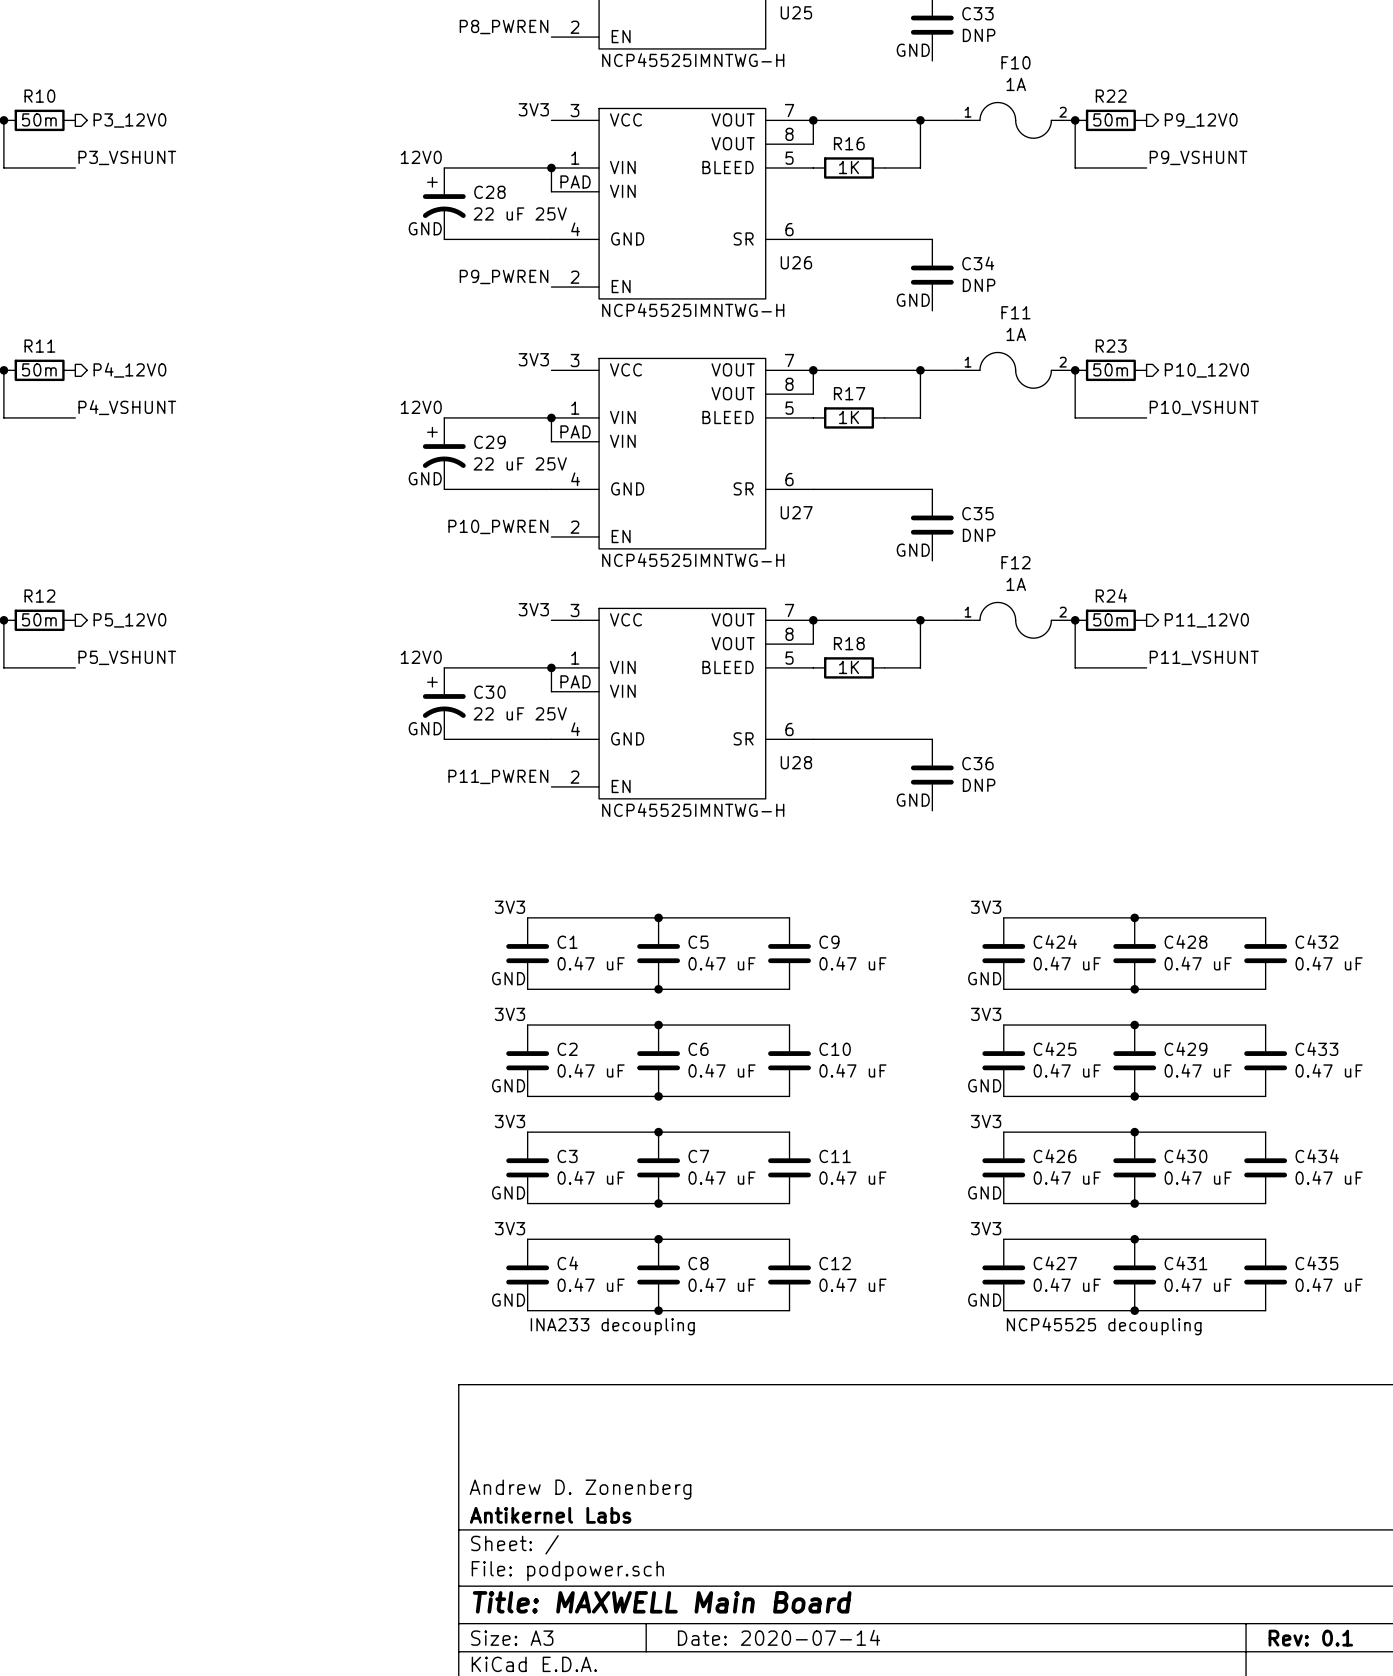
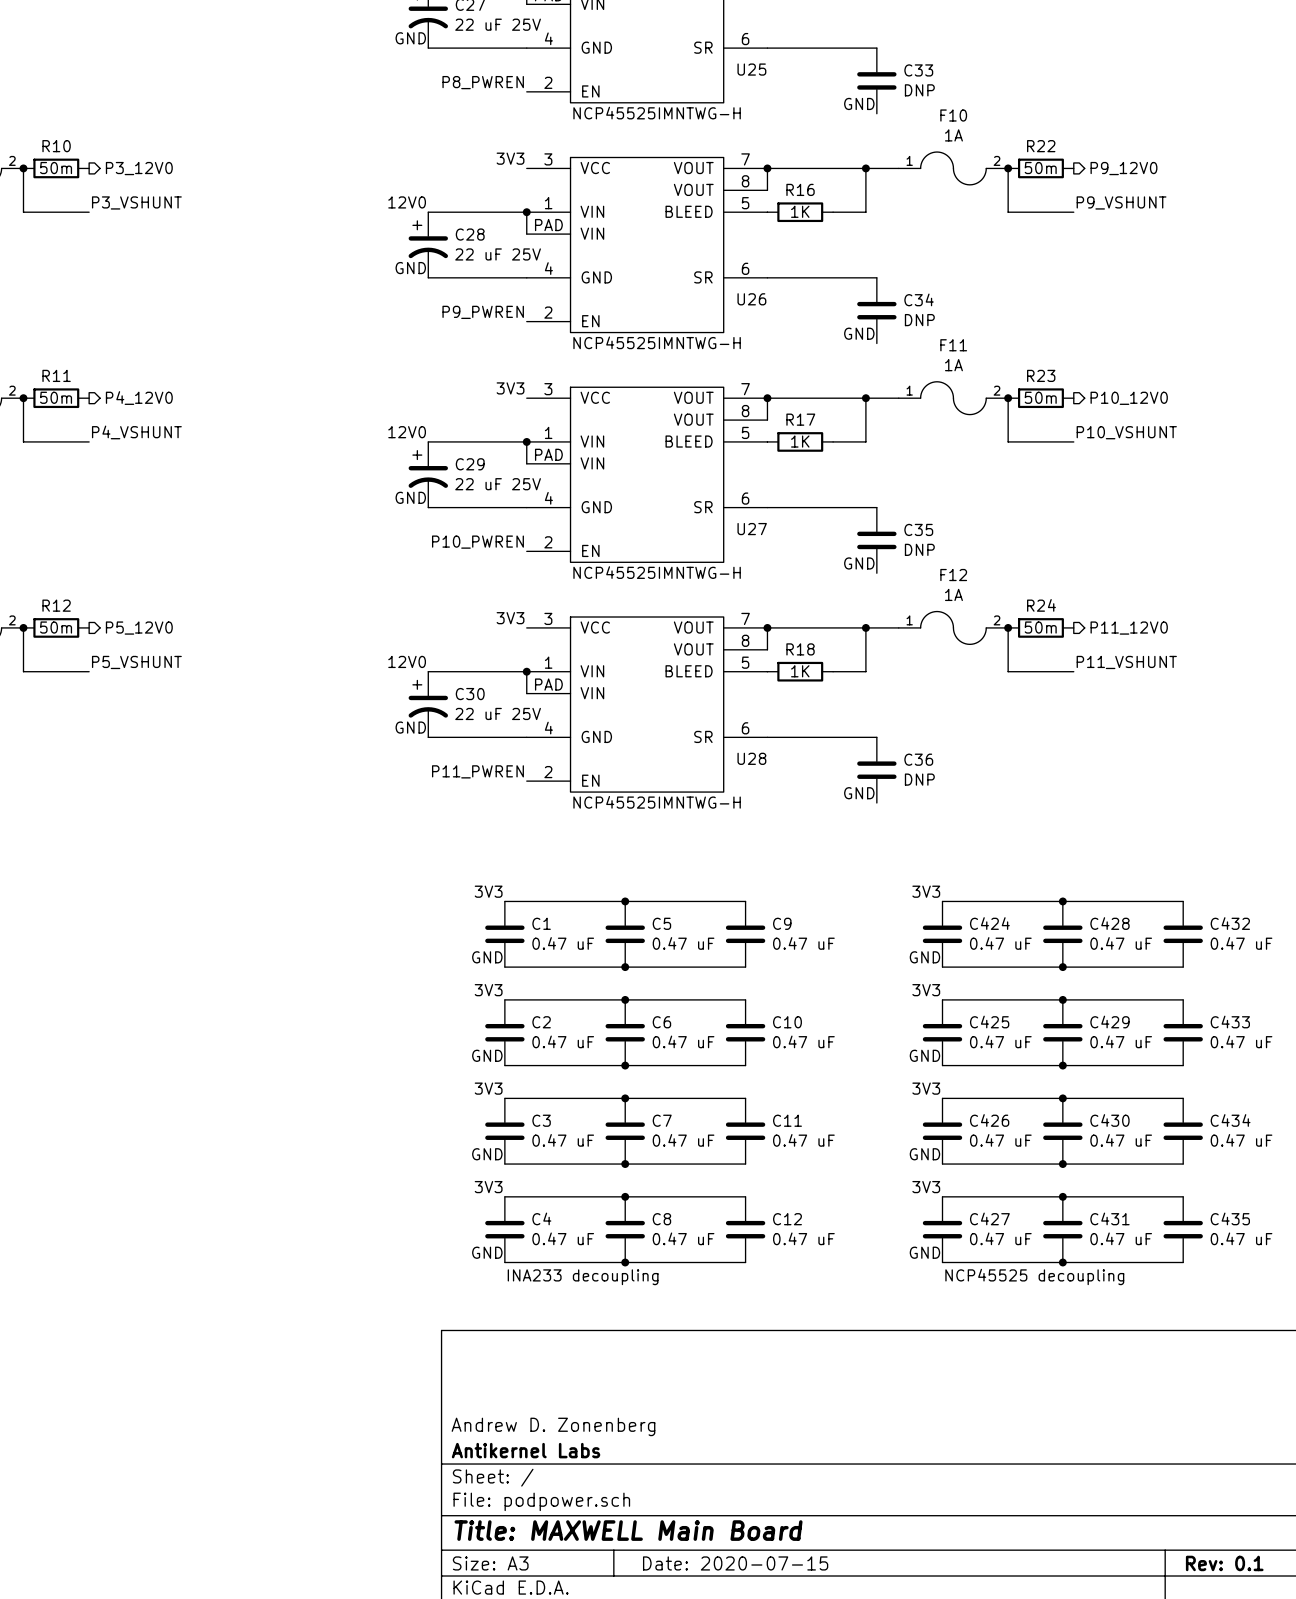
title block: Date: 2020-07-14 (779, 1637) -> Date: 2020-07-15 (735, 1563)

